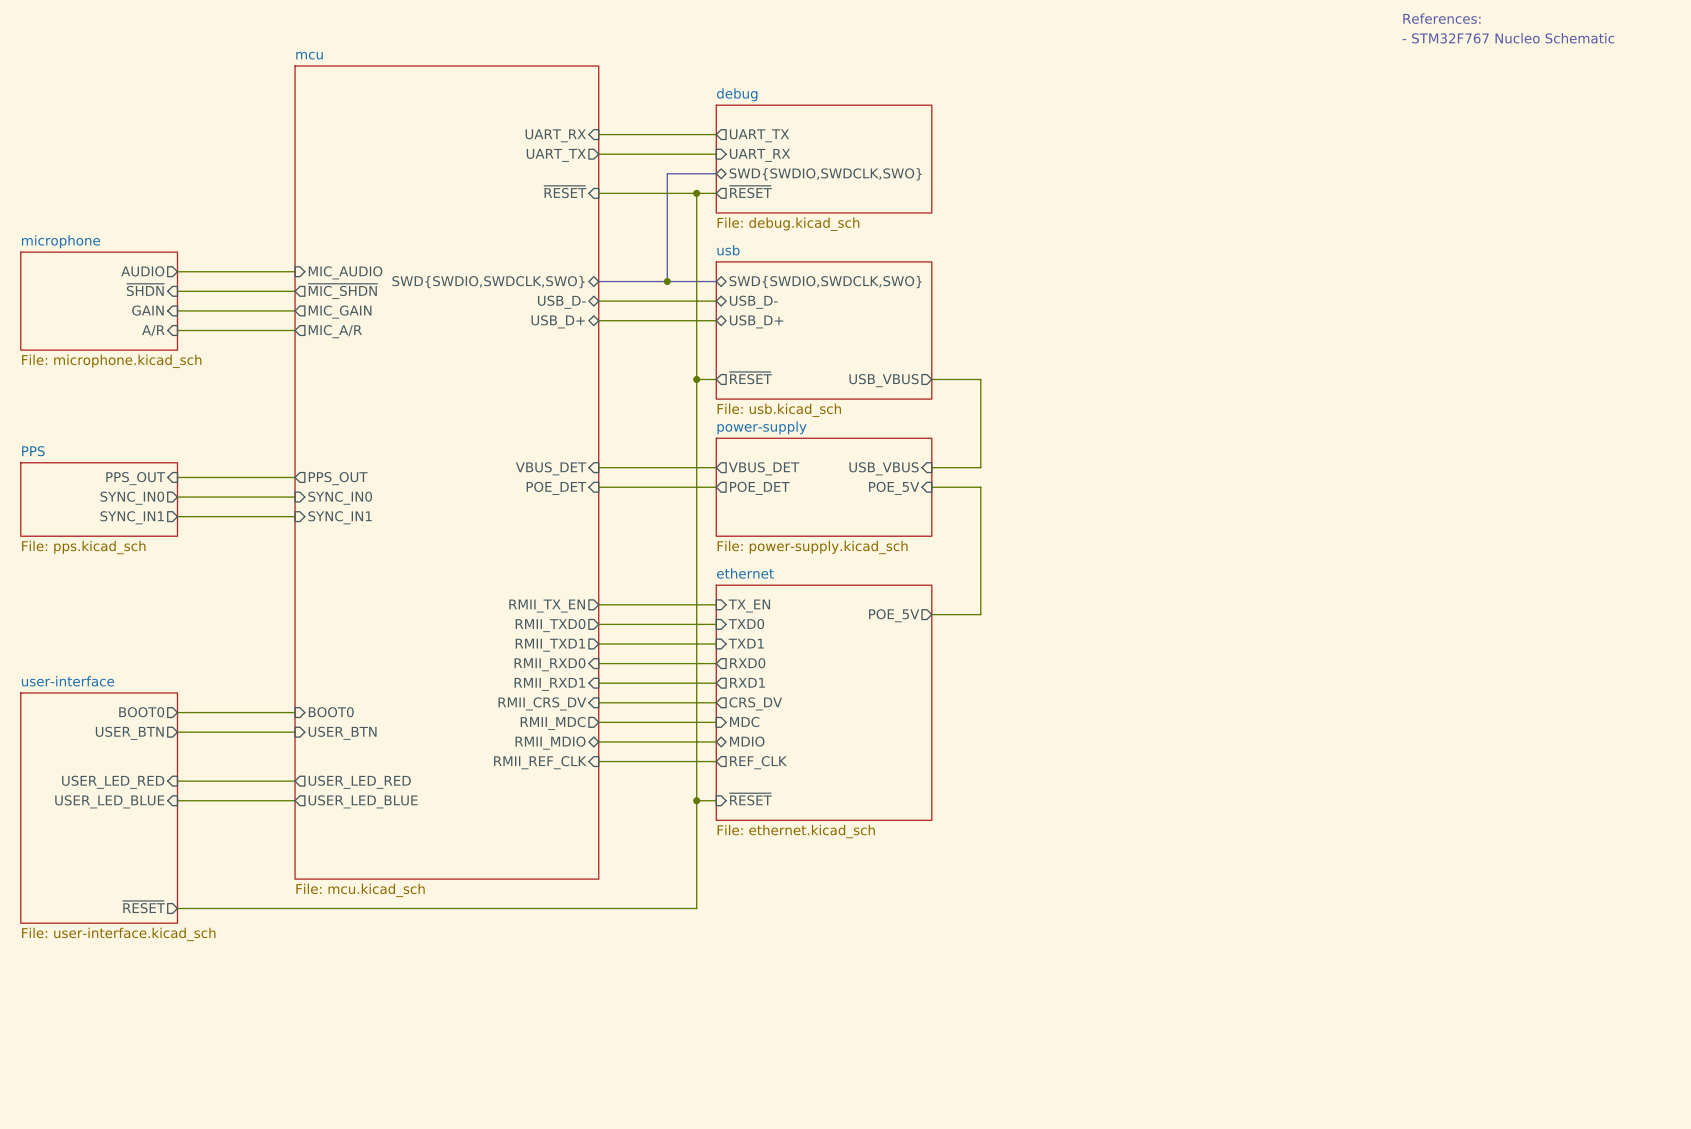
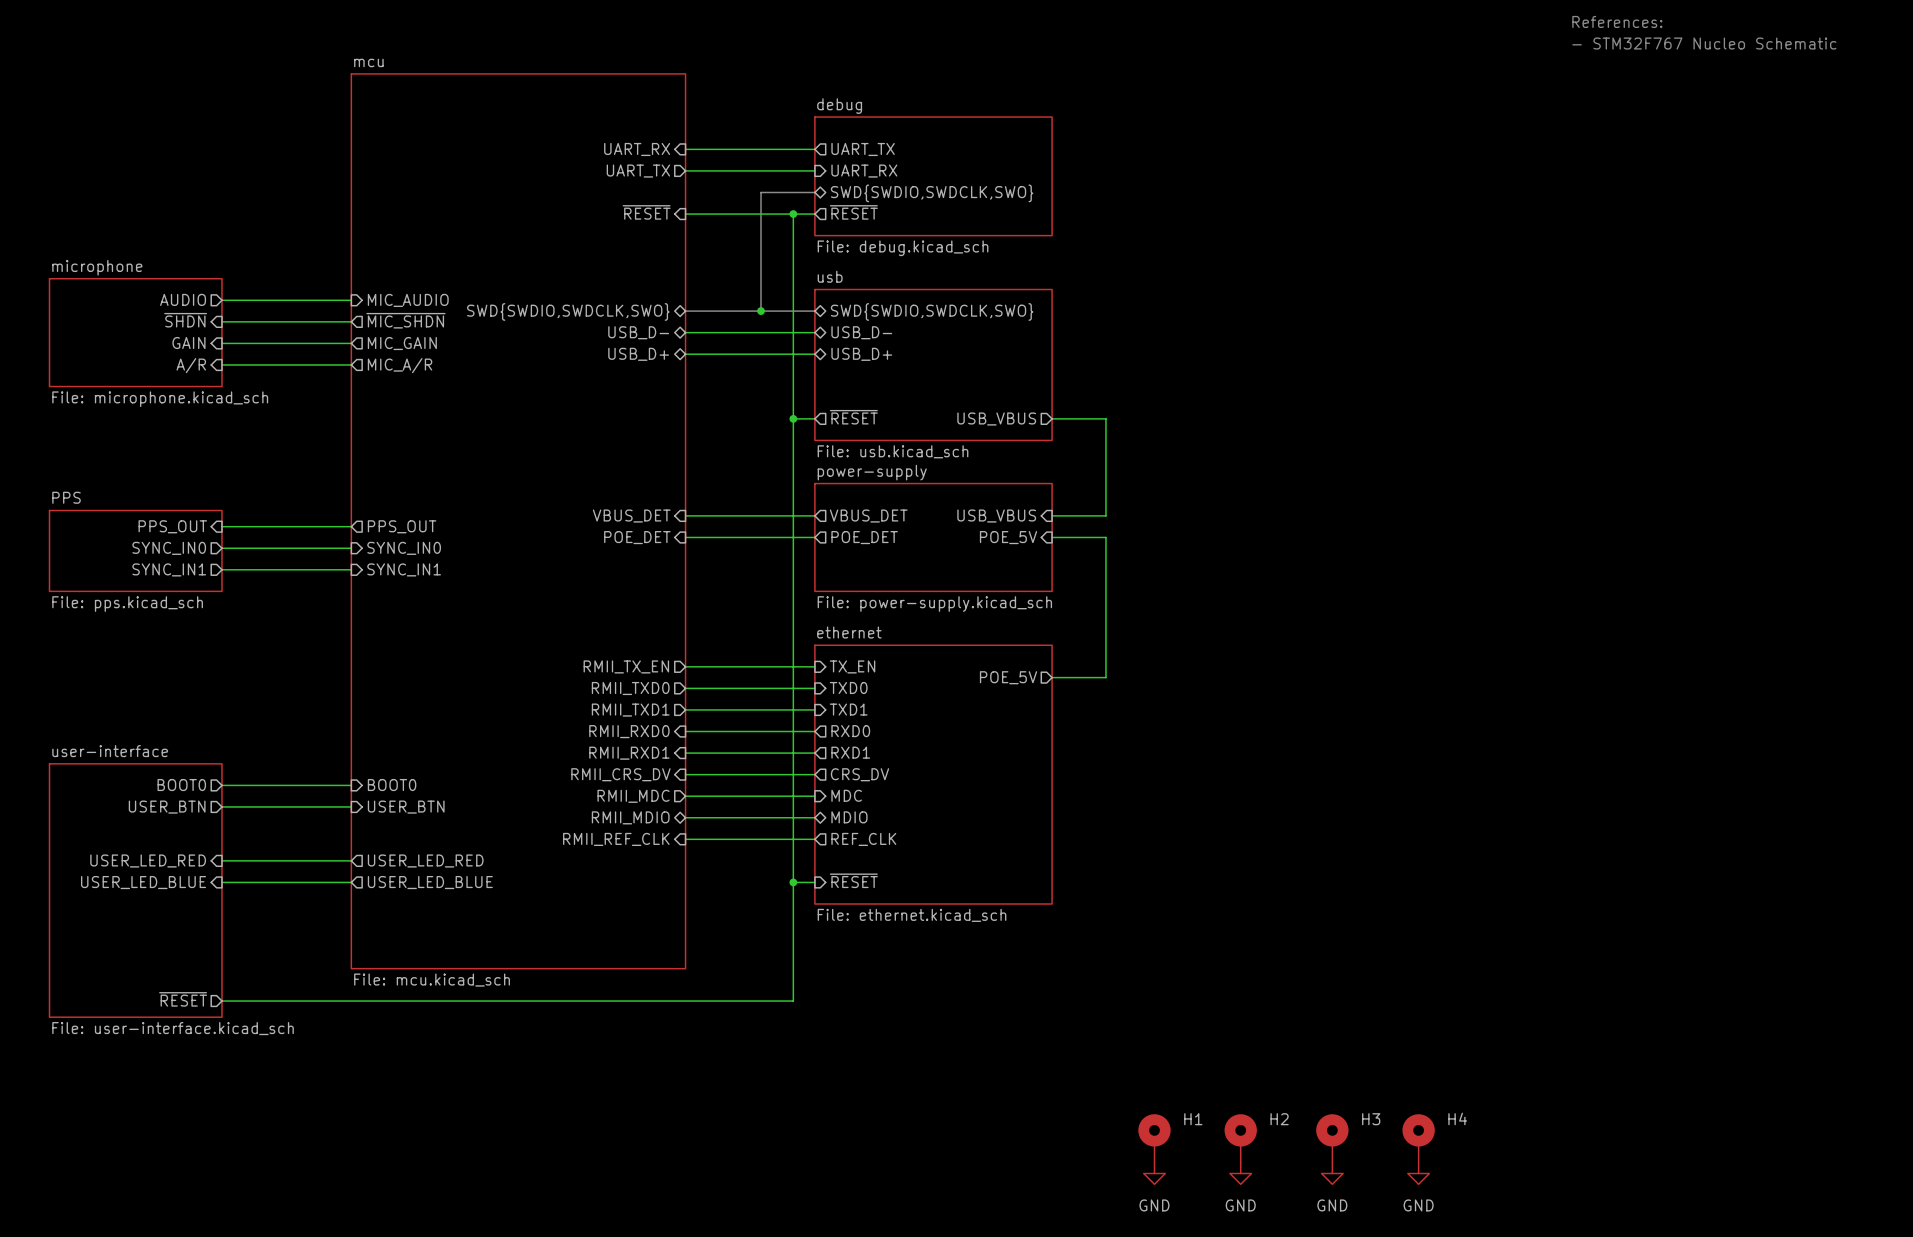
H1: none -> (1154, 1138)
H2: none -> (1240, 1138)
H3: none -> (1332, 1138)
H4: none -> (1418, 1138)
power symbol: none -> GND (1154, 1173)
power symbol: none -> GND (1240, 1173)
power symbol: none -> GND (1332, 1173)
power symbol: none -> GND (1418, 1173)

